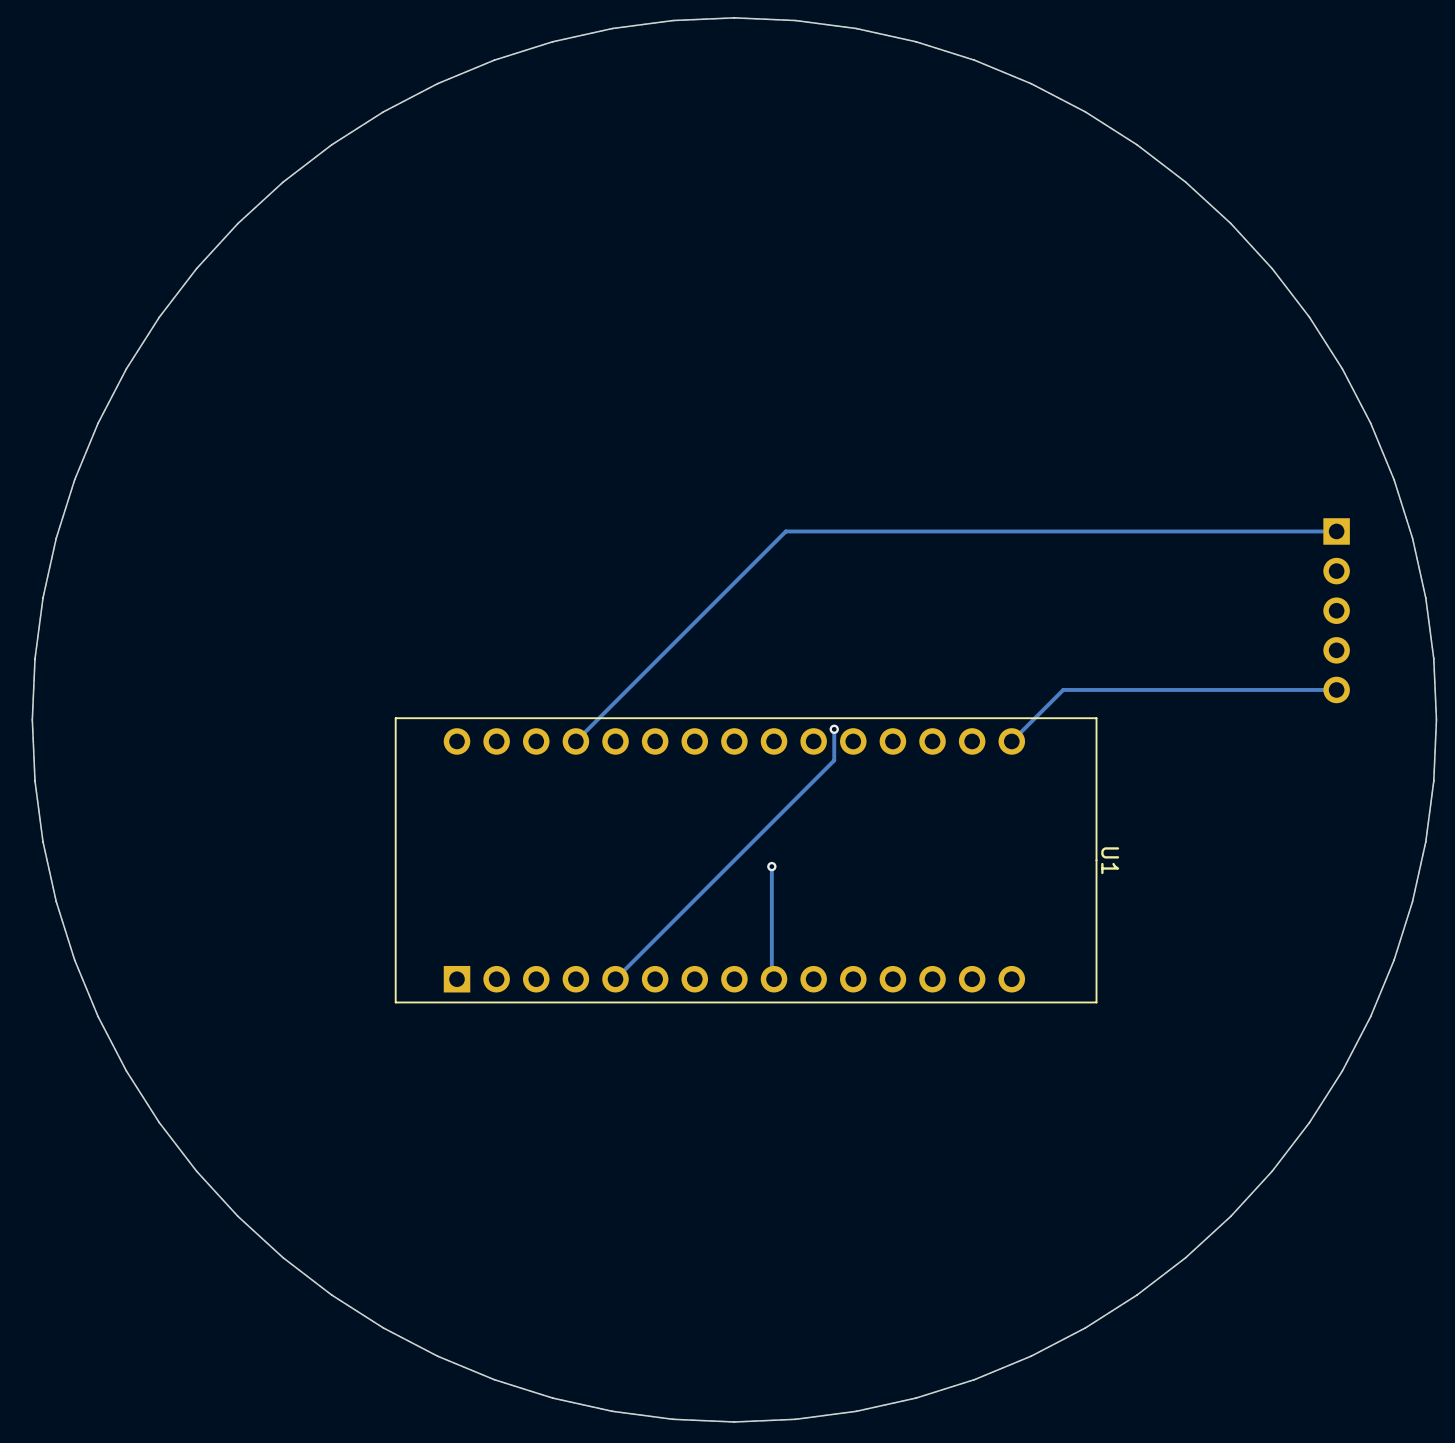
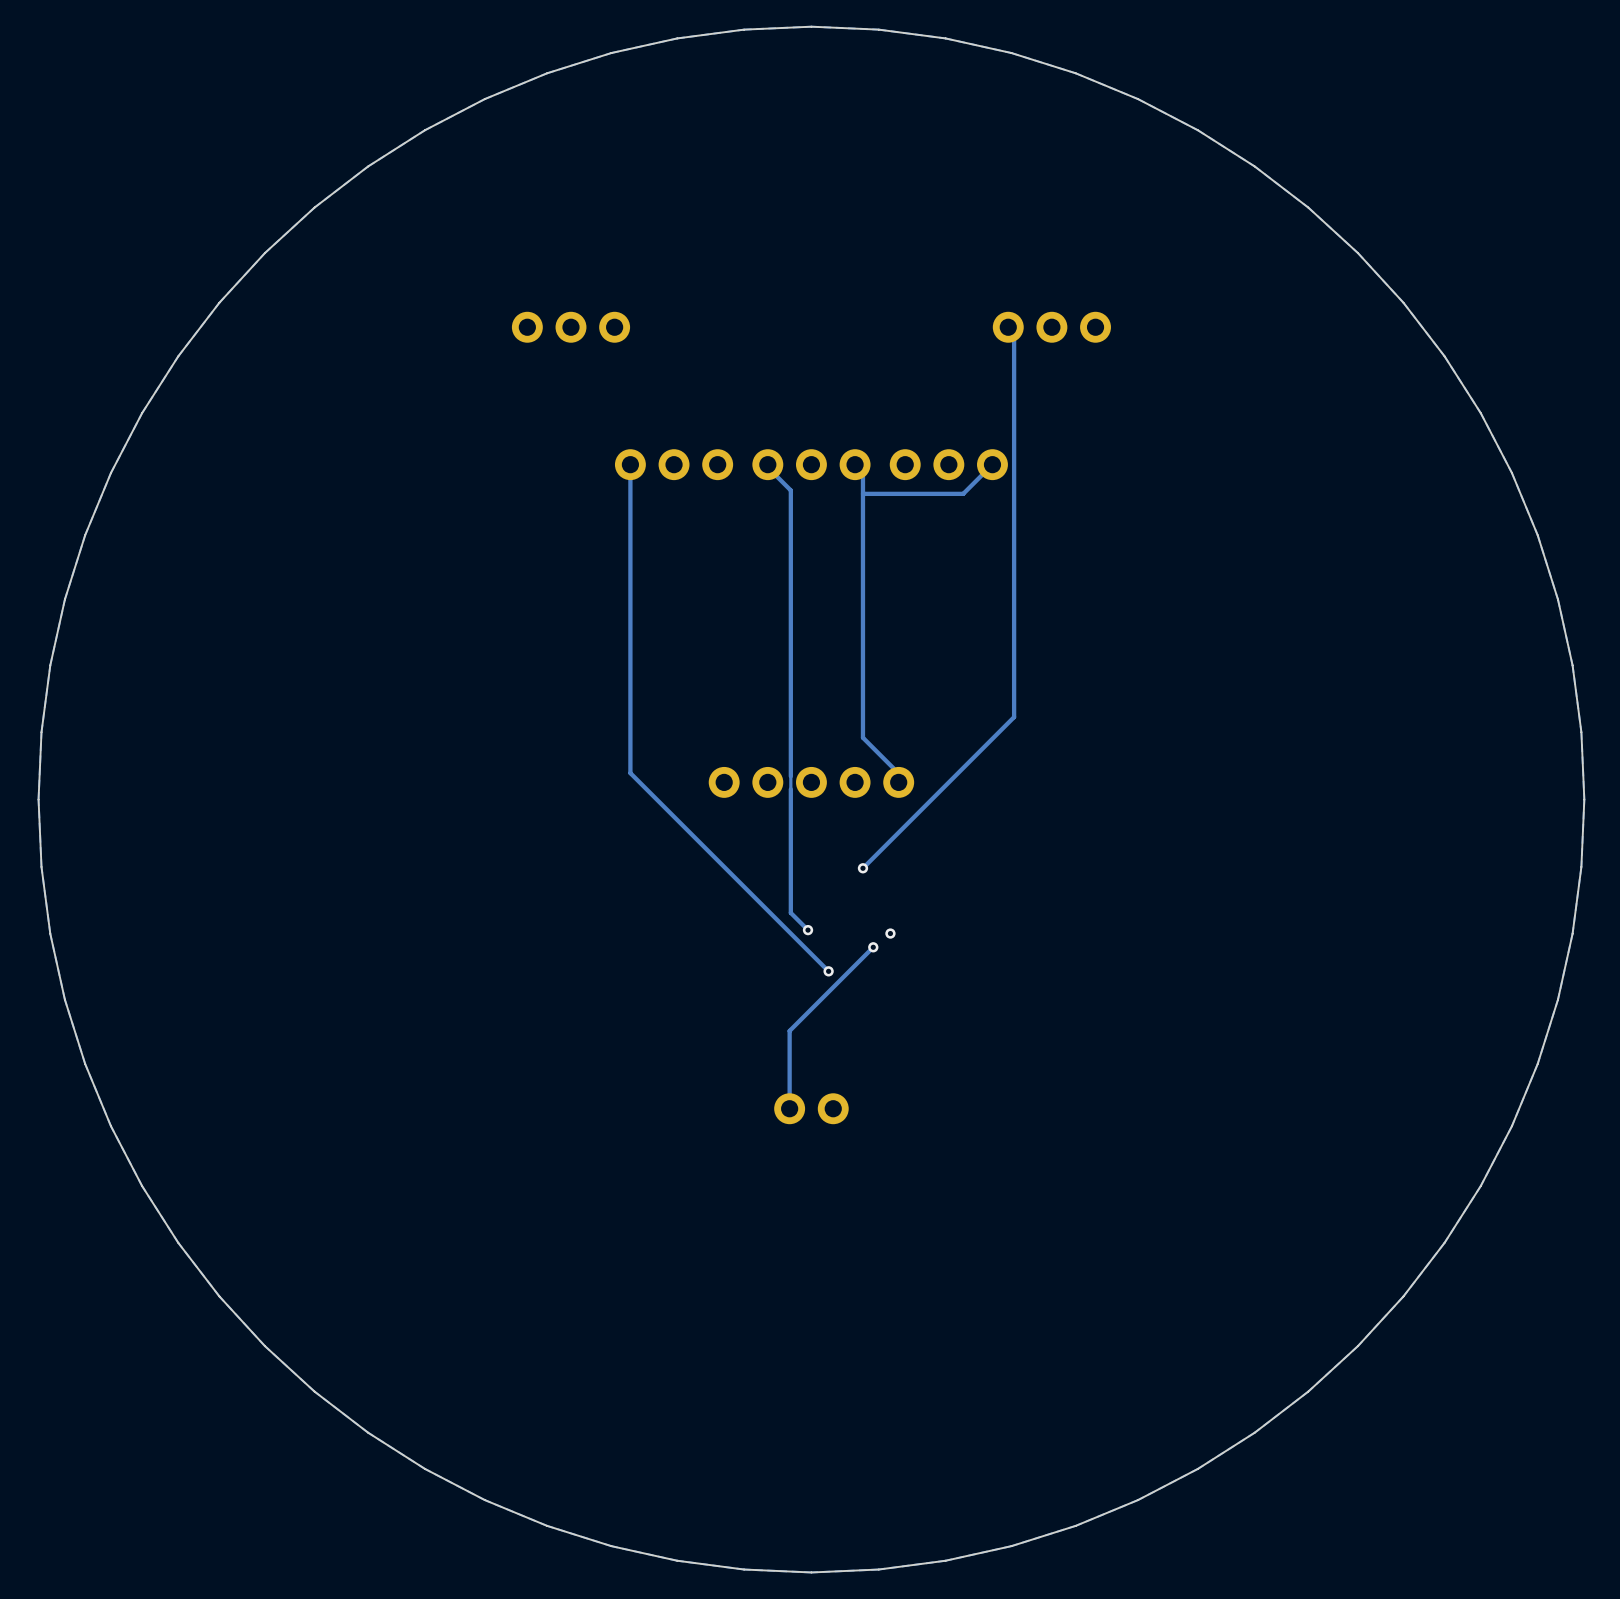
part: none -> (570, 327)
track: none -> (1008, 327) (1014, 333) (1014, 717) (862, 868)
part: none -> (1051, 327)
track: none -> (630, 464) (630, 773) (828, 971)
part: none -> (674, 464)
track: none -> (767, 464) (767, 467) (790, 490) (790, 912) (808, 930)
part: none -> (811, 464)
part: none -> (948, 464)
track: none -> (992, 464) (963, 493) (862, 493)
track: none -> (862, 476) (862, 737) (893, 768)
track: (1336, 531) (785, 531) (575, 741) -> none
part: (1336, 610) -> none
track: (1336, 689) (1063, 689) (1011, 741) -> none
part: none -> (811, 782)
track: (834, 729) (834, 760) (615, 979) -> none
via: (834, 729) -> none
via: none -> (862, 868)
via: none -> (808, 930)
via: none -> (890, 933)
track: none -> (873, 947) (789, 1030) (789, 1108)
via: none -> (873, 947)
U1: (746, 860) -> none
track: (771, 866) (771, 977) (774, 979) -> none
via: (771, 866) -> none
via: none -> (828, 971)
part: none -> (811, 1108)

